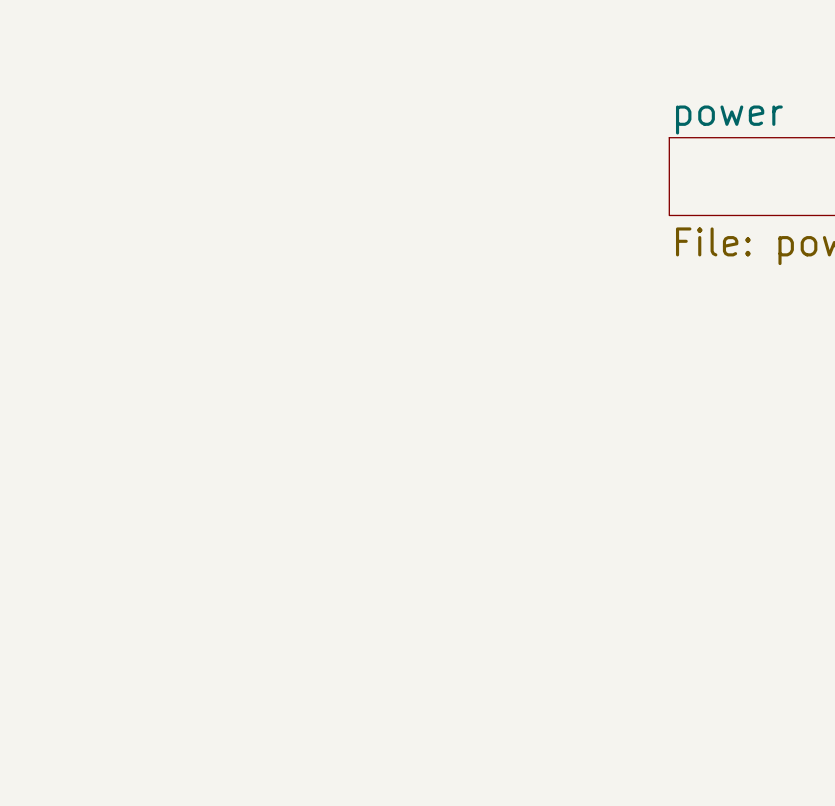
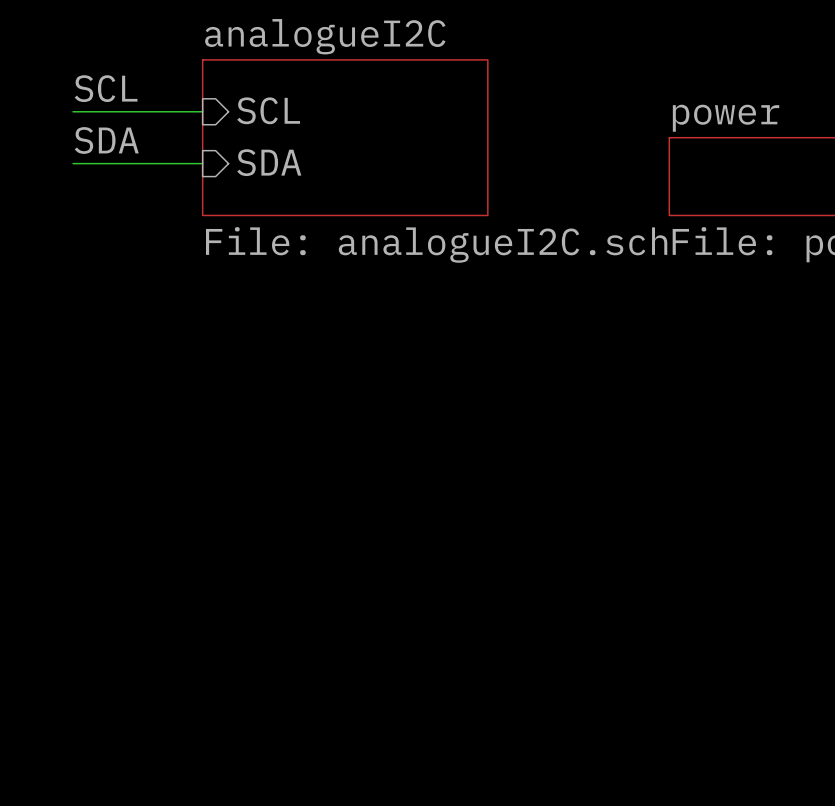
label: none -> SCL (106, 88)
sheet pin: none -> SCL (268, 110)
wire: none -> (73, 111) (202, 111)
sheet analogueI2C: none -> File: analogueI2C.sch (345, 137)
label: none -> SDA (106, 140)
sheet pin: none -> SDA (269, 162)
wire: none -> (73, 163) (202, 163)

